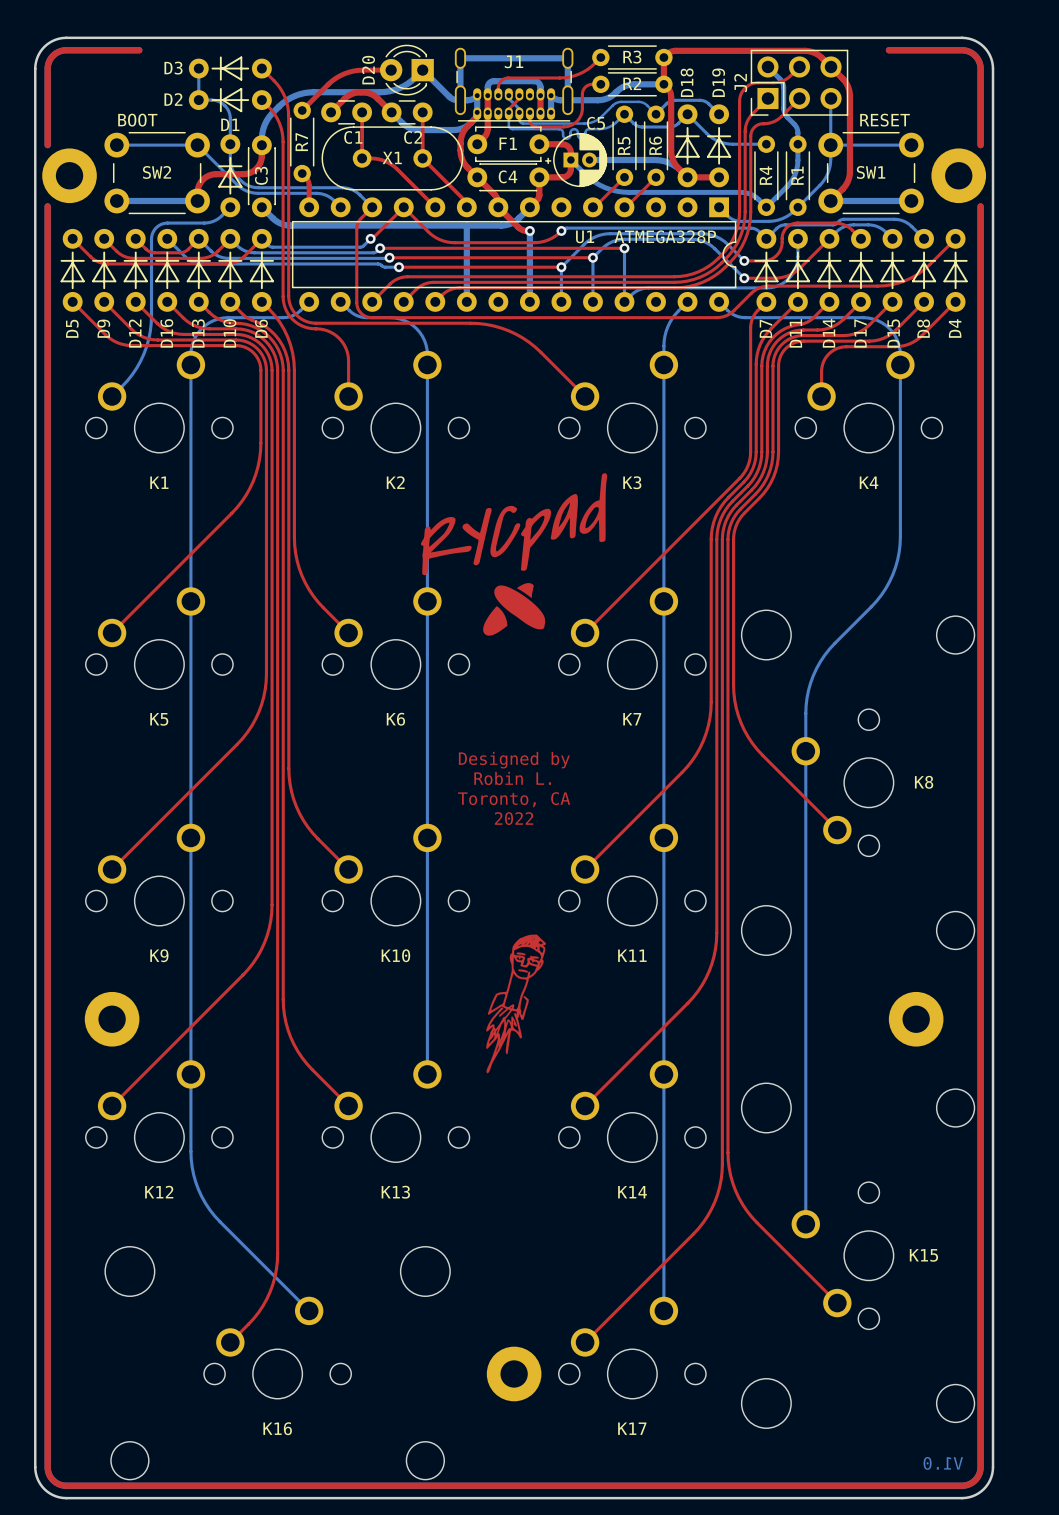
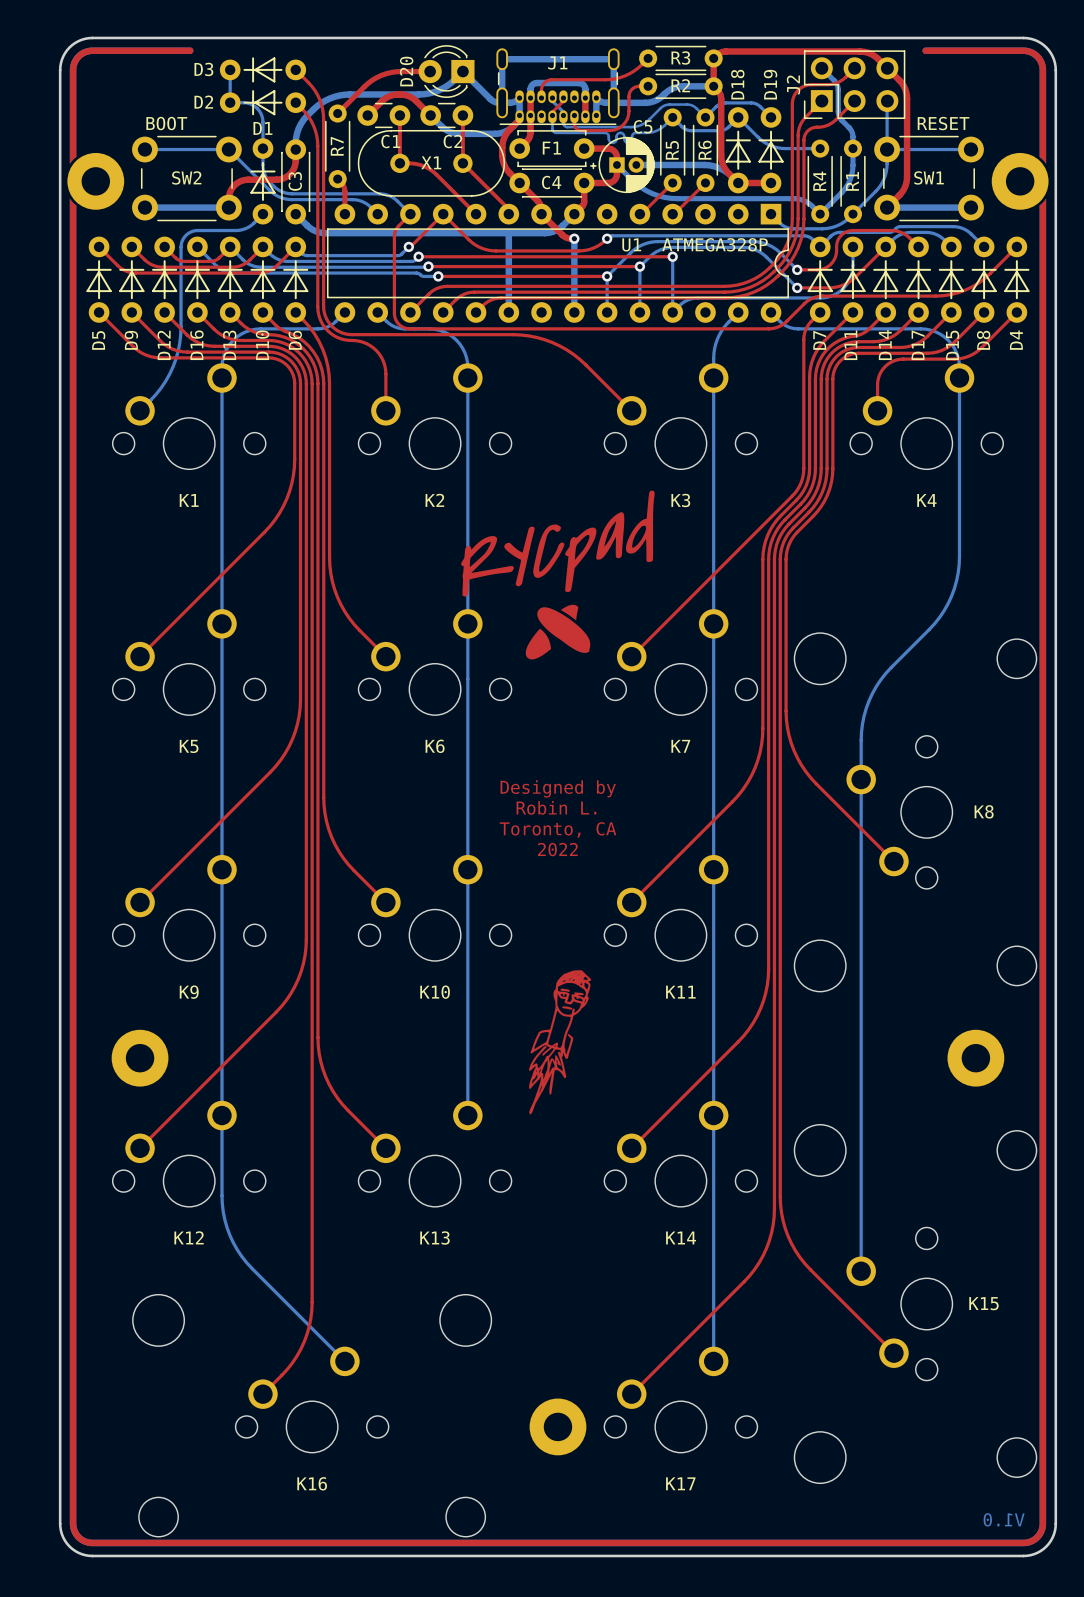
drawing: [44, 47, 984, 1489] -> none
drawing: none -> [69, 47, 1047, 1547]

